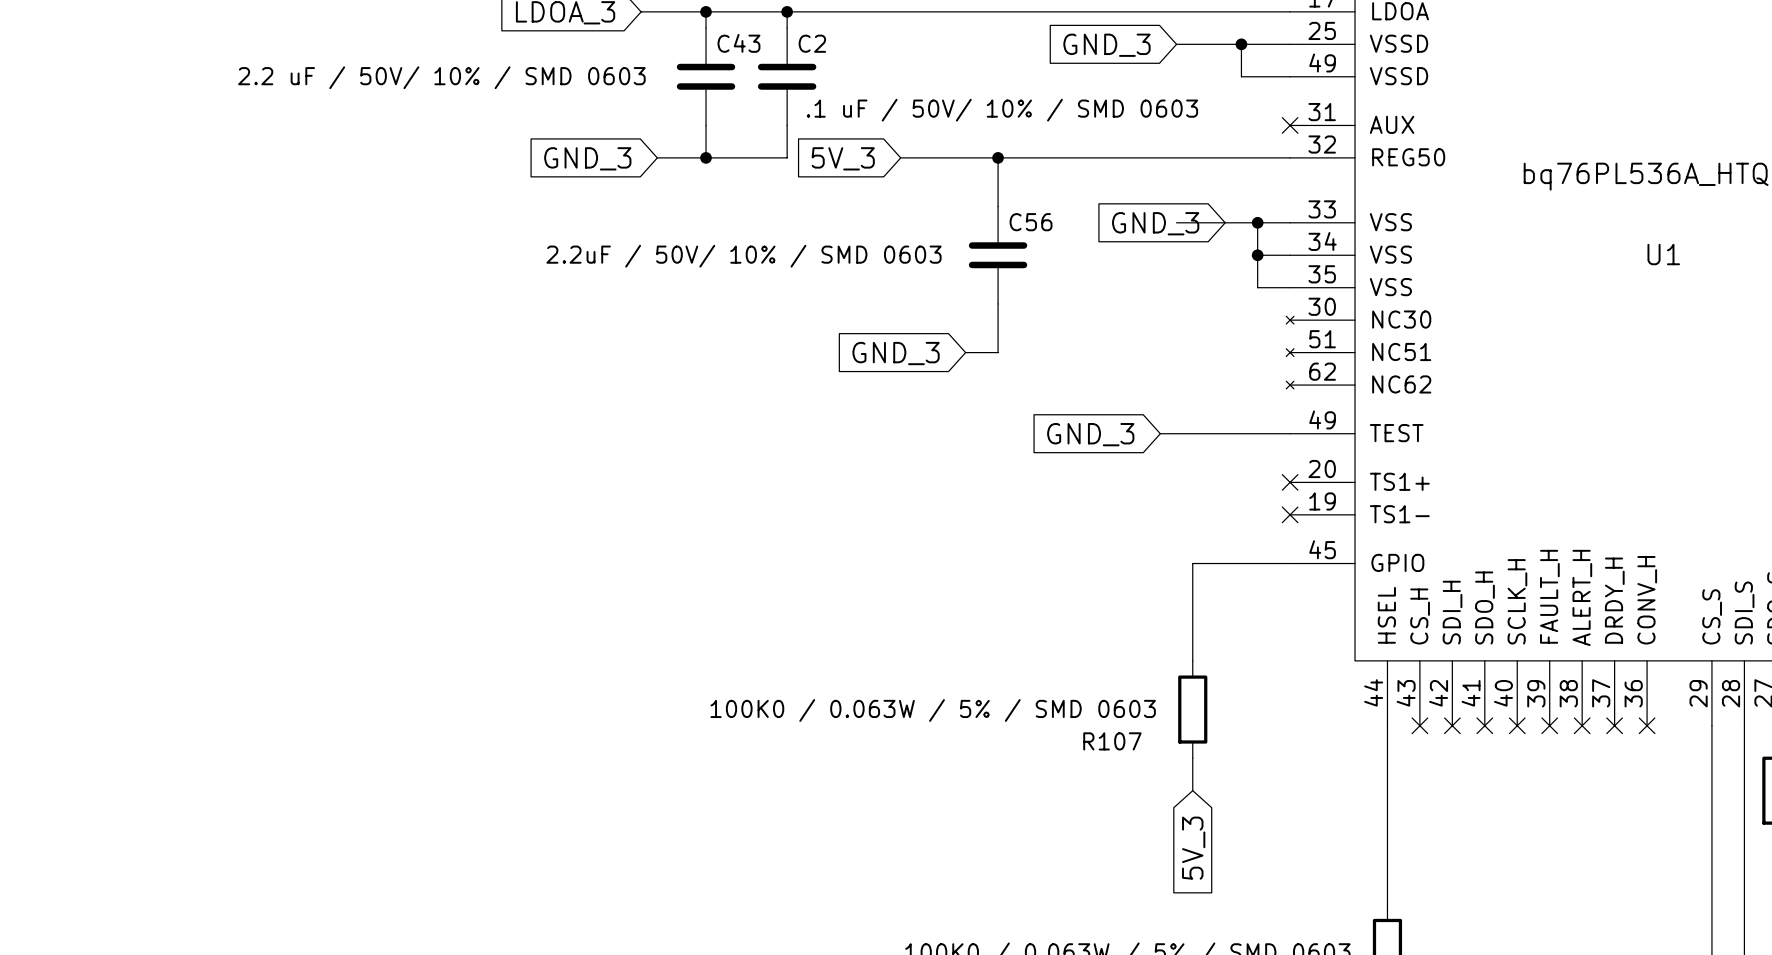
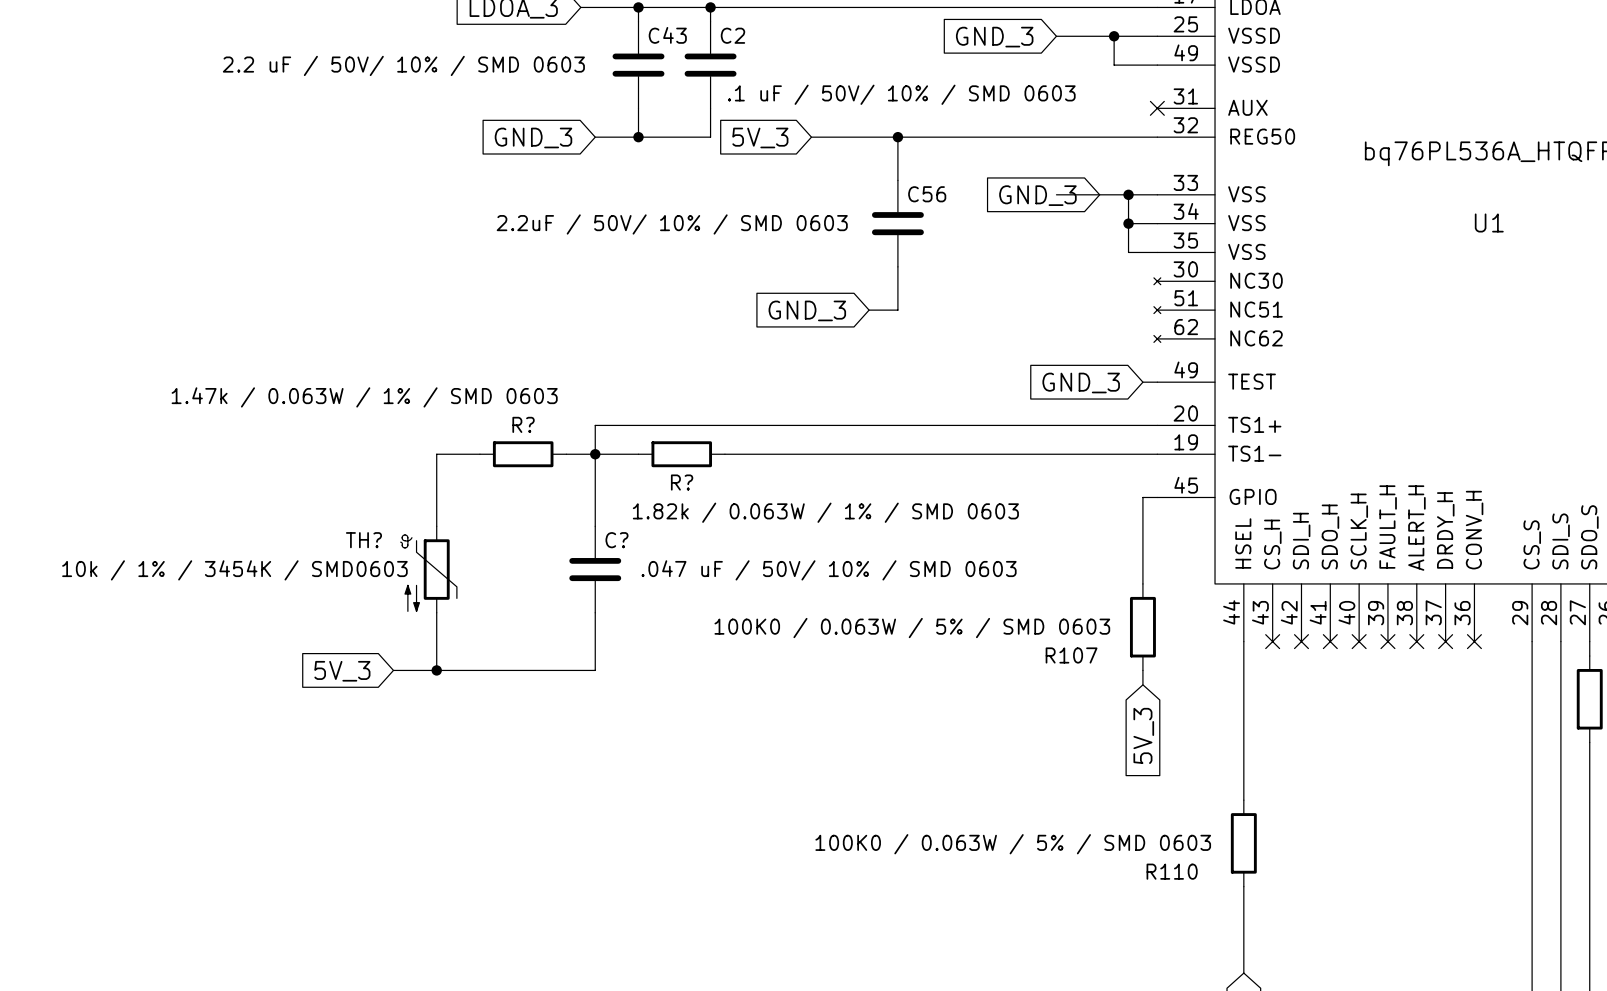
wire: (1160, 433) (1273, 433) -> none
global label position: GND_3 (1090, 434) -> GND_3 (1081, 383)
wire: none -> (1157, 425) (595, 425) (595, 526)
no-connect mark: (1290, 482) -> none
wire: none -> (479, 454) (436, 454) (436, 526)
R?: none -> 1.47k / 0.063W / 1% / SMD 0603 (523, 454)
wire: none -> (566, 454) (638, 454)
junction: none -> (595, 454)
R?: none -> 1.82k / 0.063W / 1% / SMD 0603 (681, 454)
wire: none -> (724, 454) (1157, 454)
no-connect mark: (1290, 514) -> none
wire: (1273, 563) (1192, 563) (1192, 660) -> (1142, 497) (1142, 583)
TH?: none -> 10k / 1% / 3454K / SMD0603 (428, 569)
C?: none -> .047 uF / 50V/ 10% / SMD 0603 (595, 569)
wire: none -> (436, 612) (436, 670)
wire: none -> (595, 612) (595, 670) (393, 670)
R107 position: (1192, 709) -> (1142, 627)
junction: none -> (436, 670)
wire: (1192, 758) (1192, 790) -> none
wire: none -> (1142, 670) (1142, 684)
global label: none -> 5V_3 (342, 671)
global label position: 5V_3 (1193, 848) -> 5V_3 (1143, 735)

